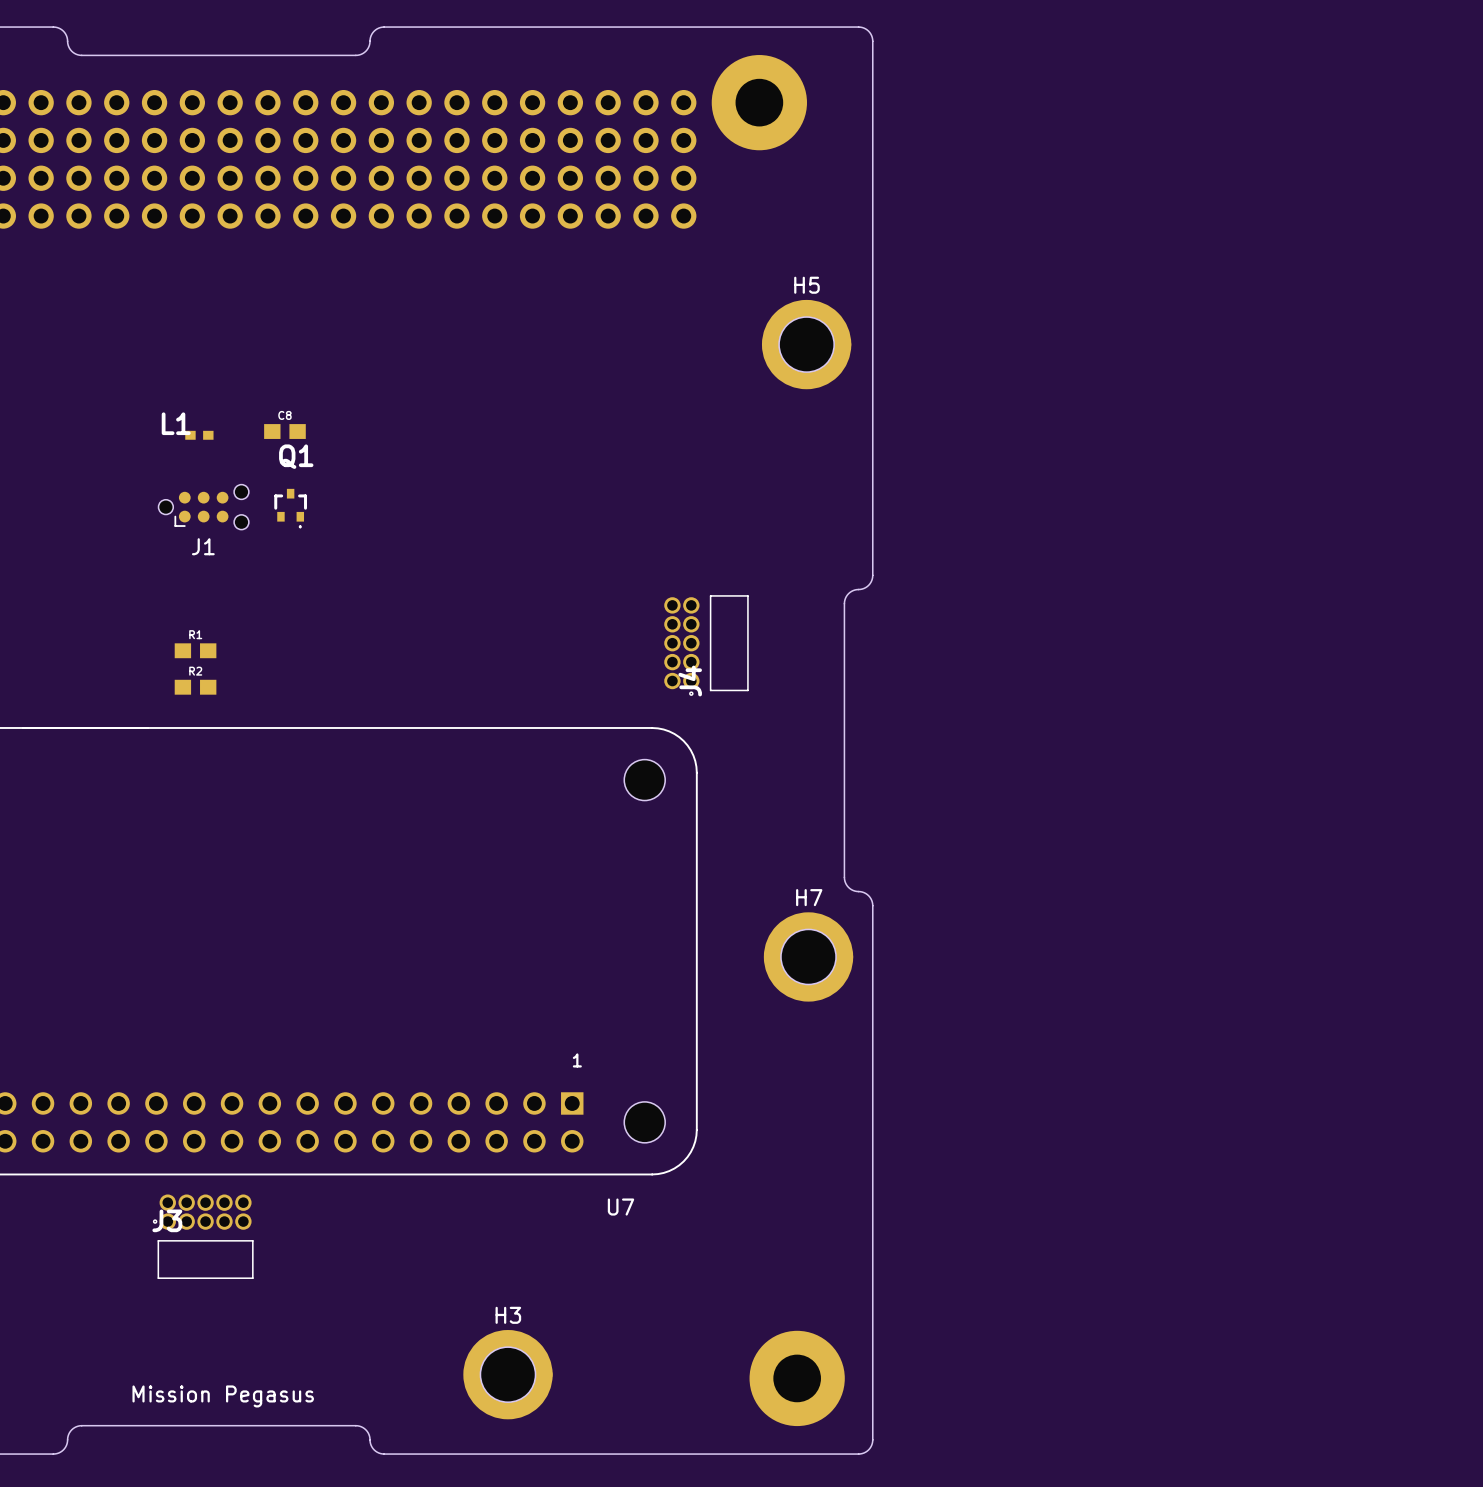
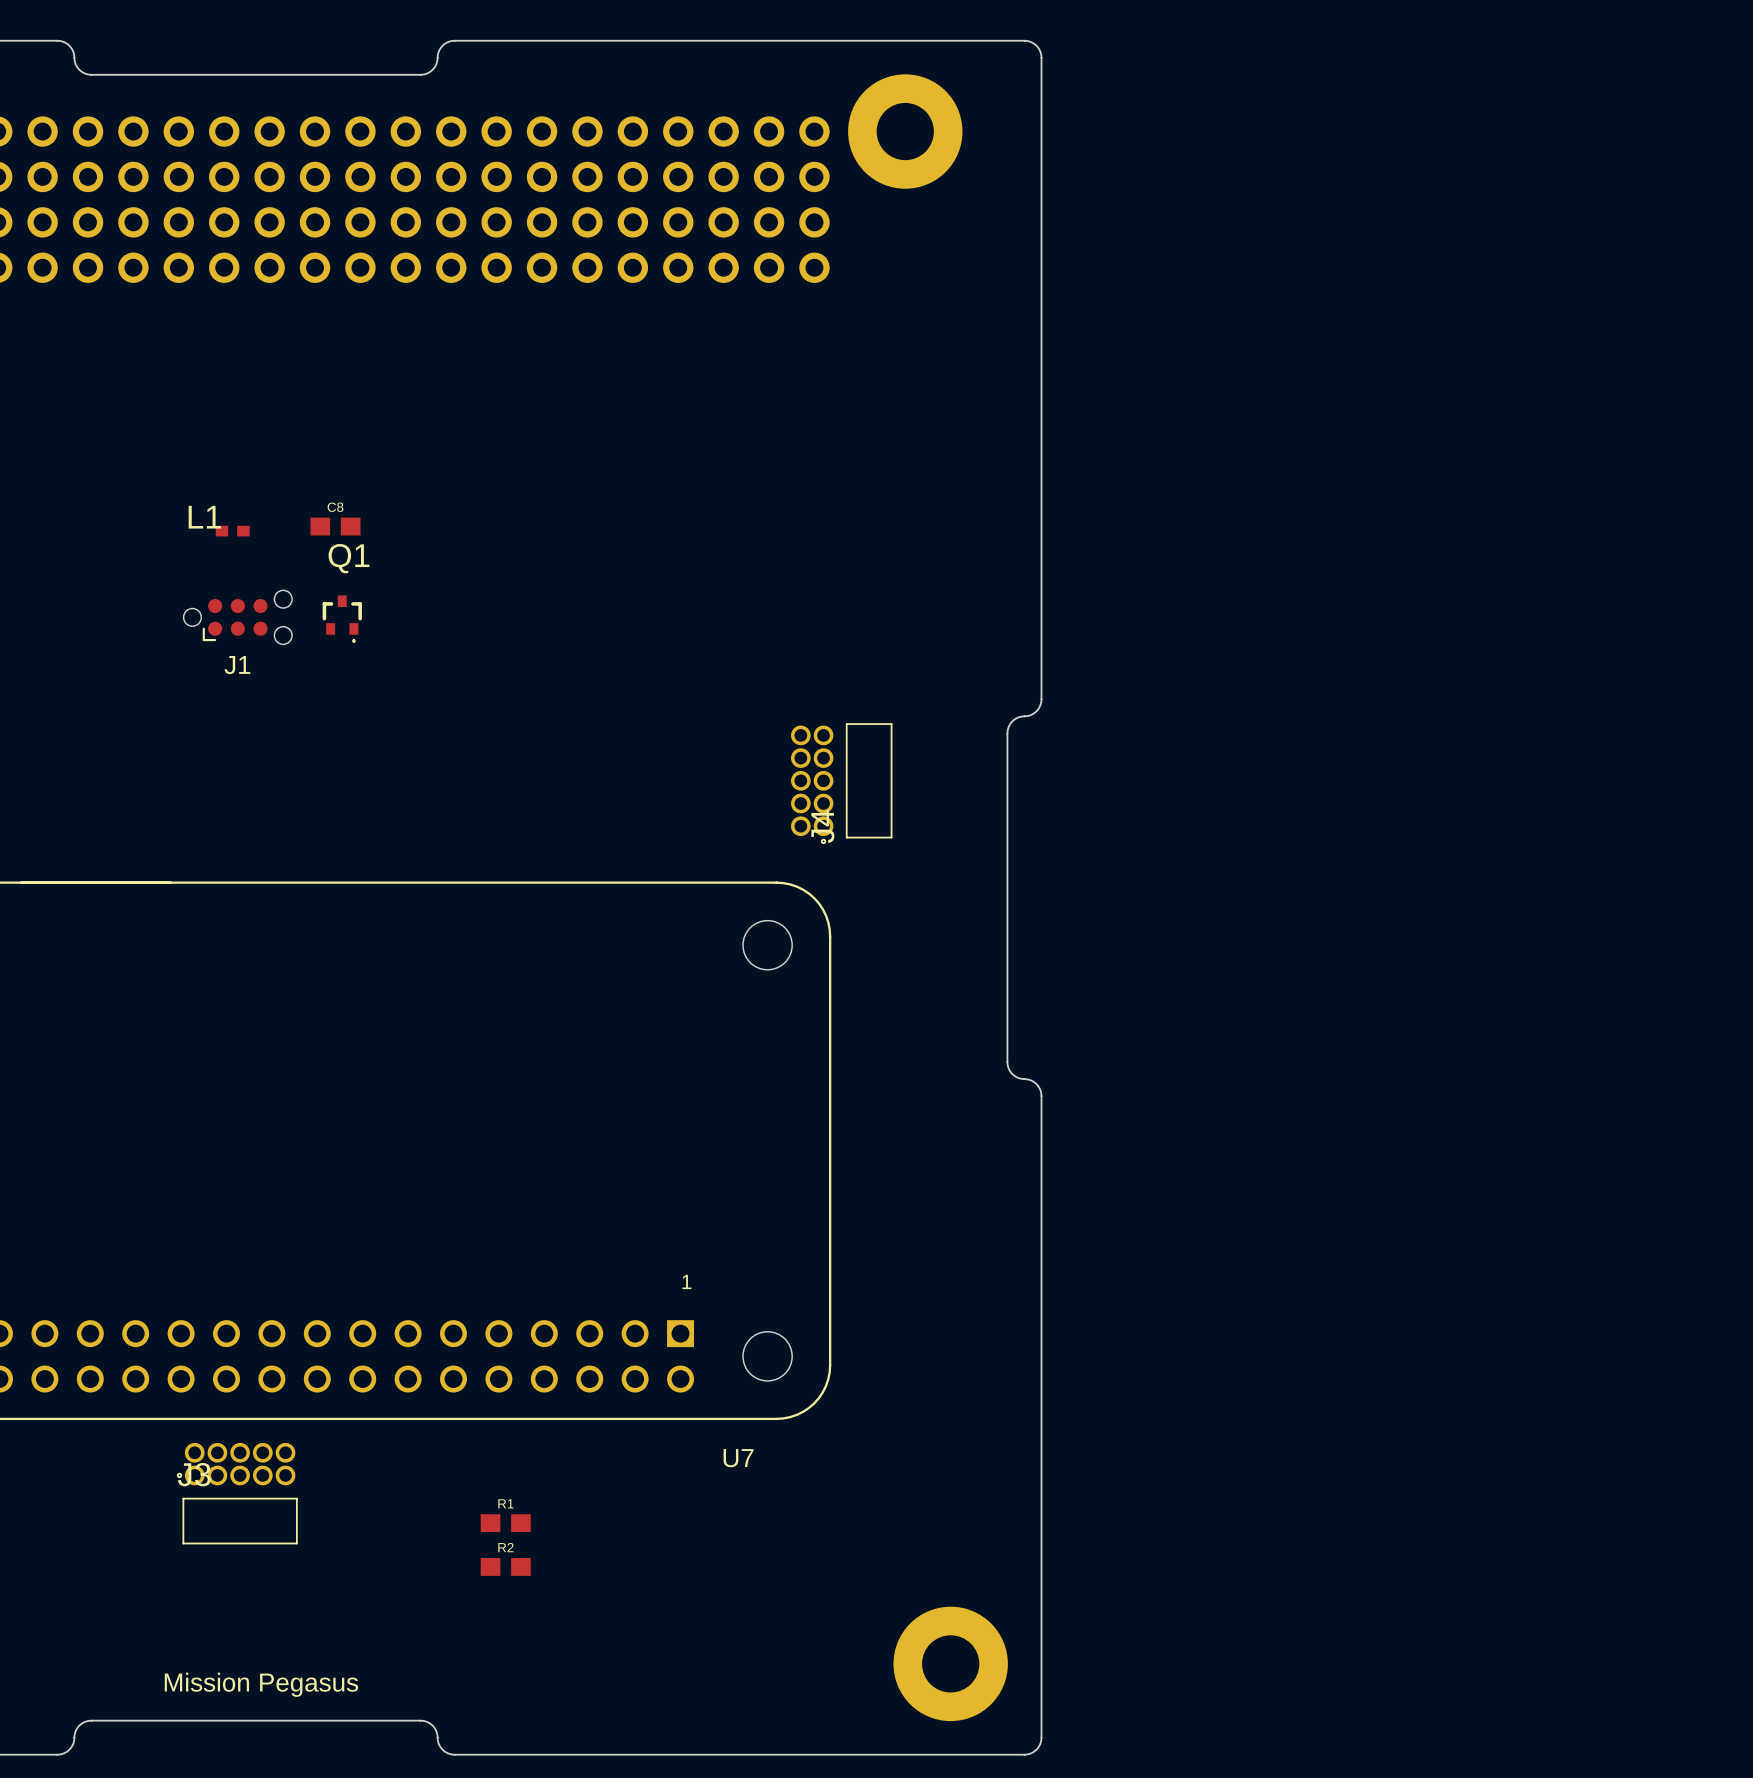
H5: (806, 344) -> none
R1 position: (195, 650) -> (505, 1523)
R2 position: (195, 687) -> (505, 1566)
H7: (808, 956) -> none
H3: (507, 1374) -> none

